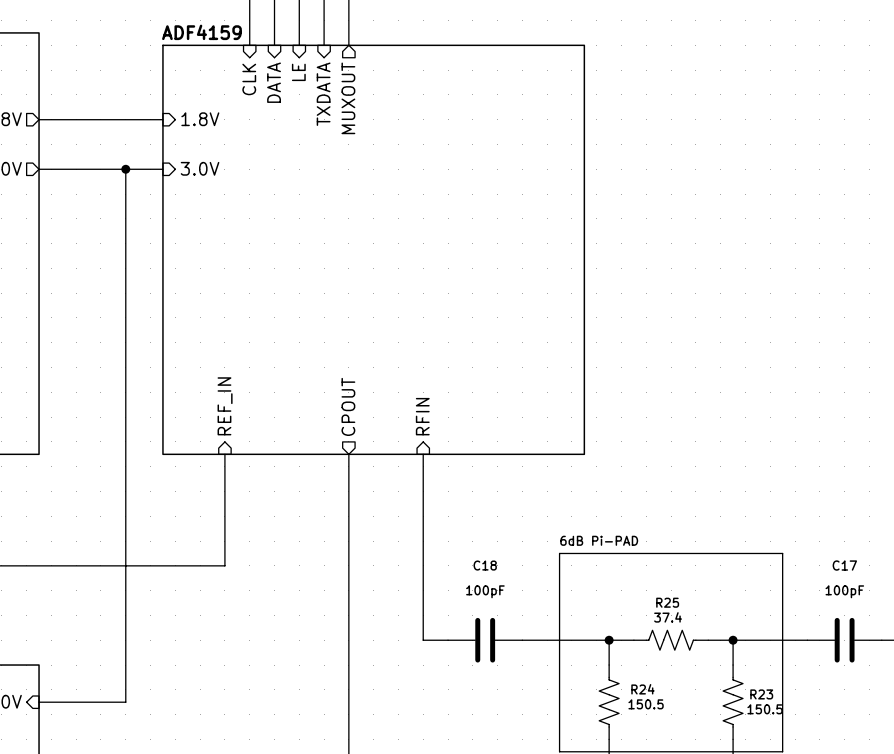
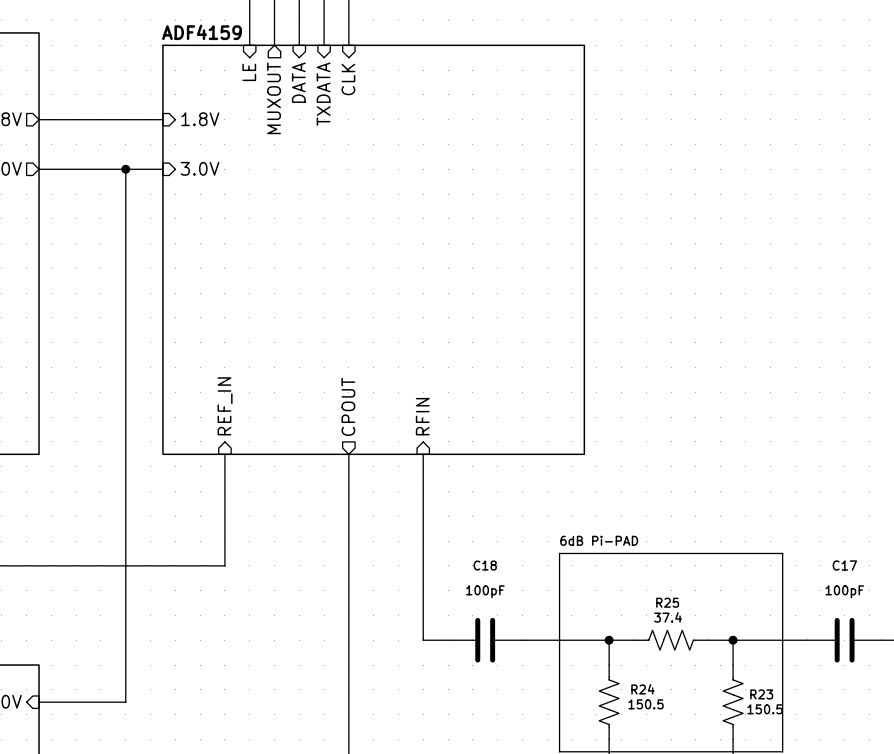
sheet pin: LE (298, 72) -> DATA (298, 82)
sheet pin: CLK (249, 79) -> LE (249, 72)
sheet pin shape: input (274, 82) -> output (274, 98)
sheet pin: DATA (274, 82) -> MUXOUT (274, 98)
sheet pin shape: output (348, 98) -> input (348, 79)
sheet pin: MUXOUT (348, 98) -> CLK (348, 79)

